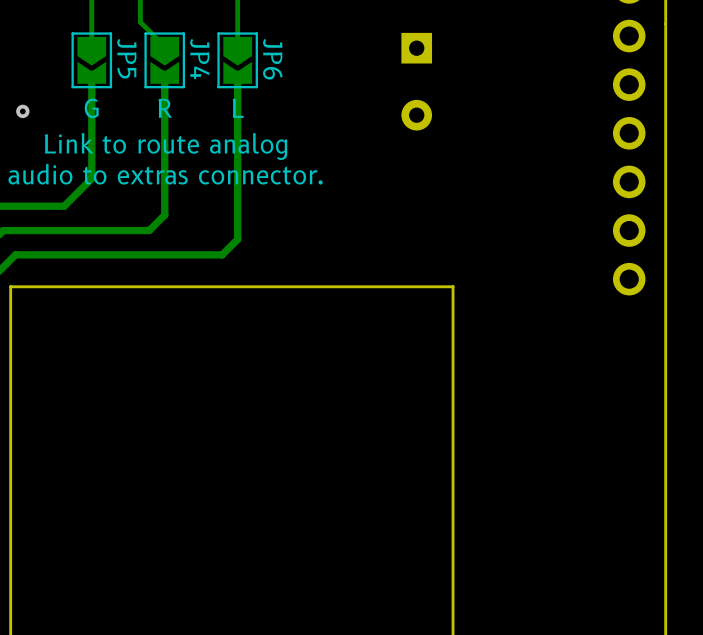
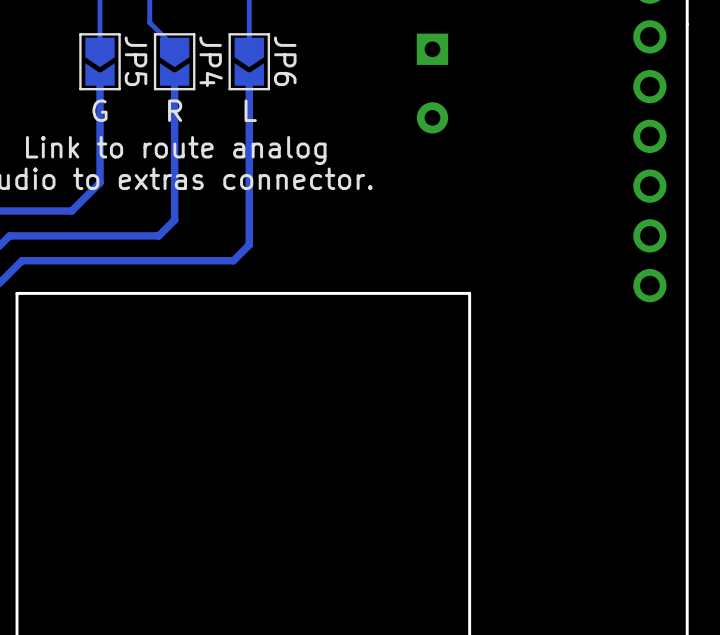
via: (22, 111) -> none

